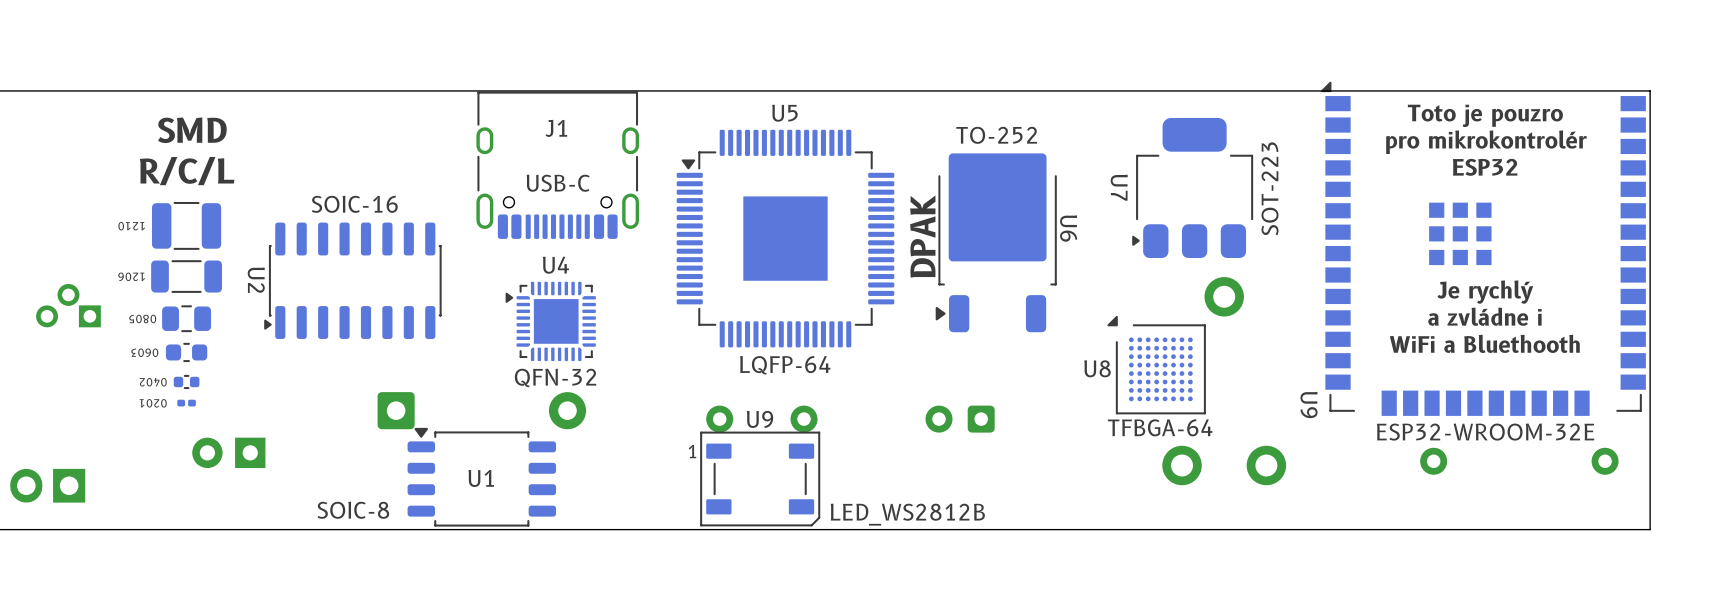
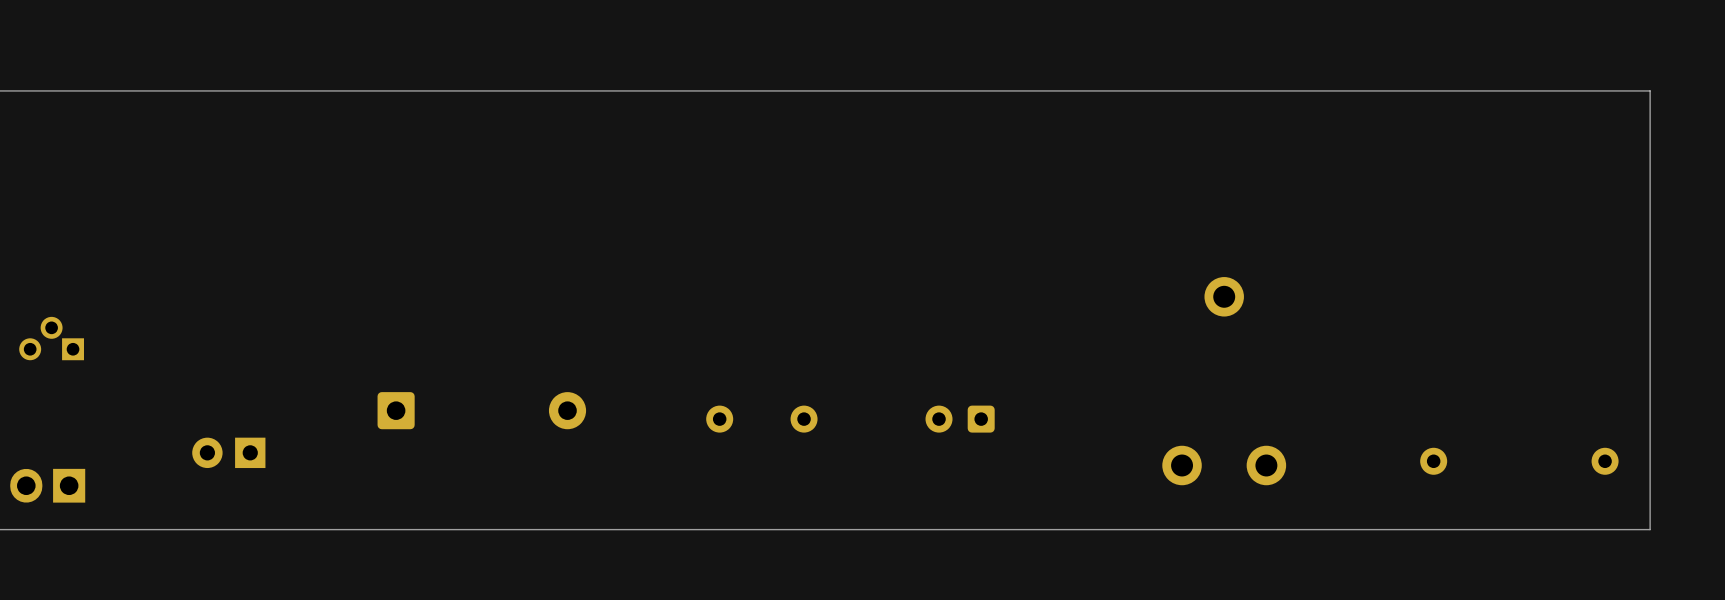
text: Toto je pouzro (1485, 115) -> none
text: SMD (192, 130) -> none
text: pro mikrokontrolér (1486, 142) -> none
J1: (557, 165) -> none
text: ESP32 (1485, 167) -> none
text: R/C/L (187, 171) -> none
U7: (1192, 187) -> none
part: (186, 225) -> none
text: DPAK (922, 236) -> none
U5: (785, 238) -> none
U6: (996, 242) -> none
U9: (1483, 248) -> none
part: (186, 276) -> none
U2: (352, 280) -> none
text: Je rychlý (1485, 292) -> none
part position: (68, 305) -> (51, 338)
text: a zvládne i (1485, 316) -> none
part: (186, 318) -> none
U4: (550, 321) -> none
text: WiFi a Bluethooth (1484, 343) -> none
part: (186, 352) -> none
U8: (1156, 365) -> none
part: (186, 381) -> none
part: (186, 403) -> none
U1: (481, 477) -> none
U9: (760, 478) -> none

